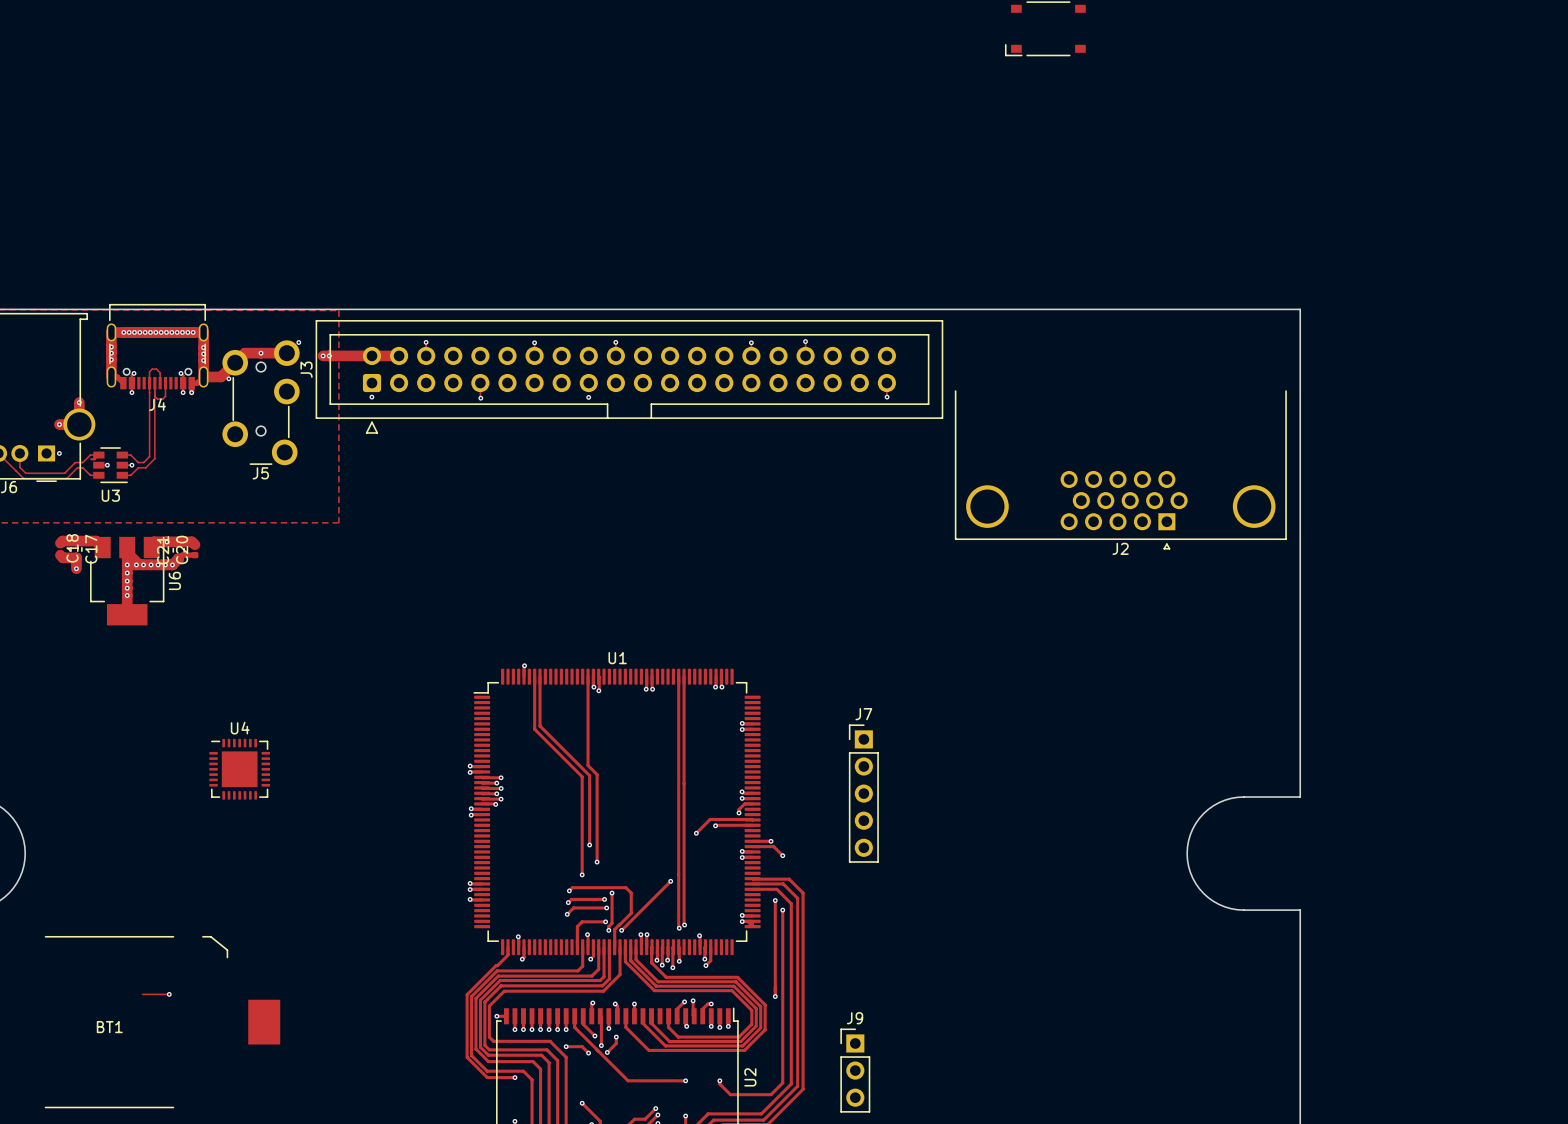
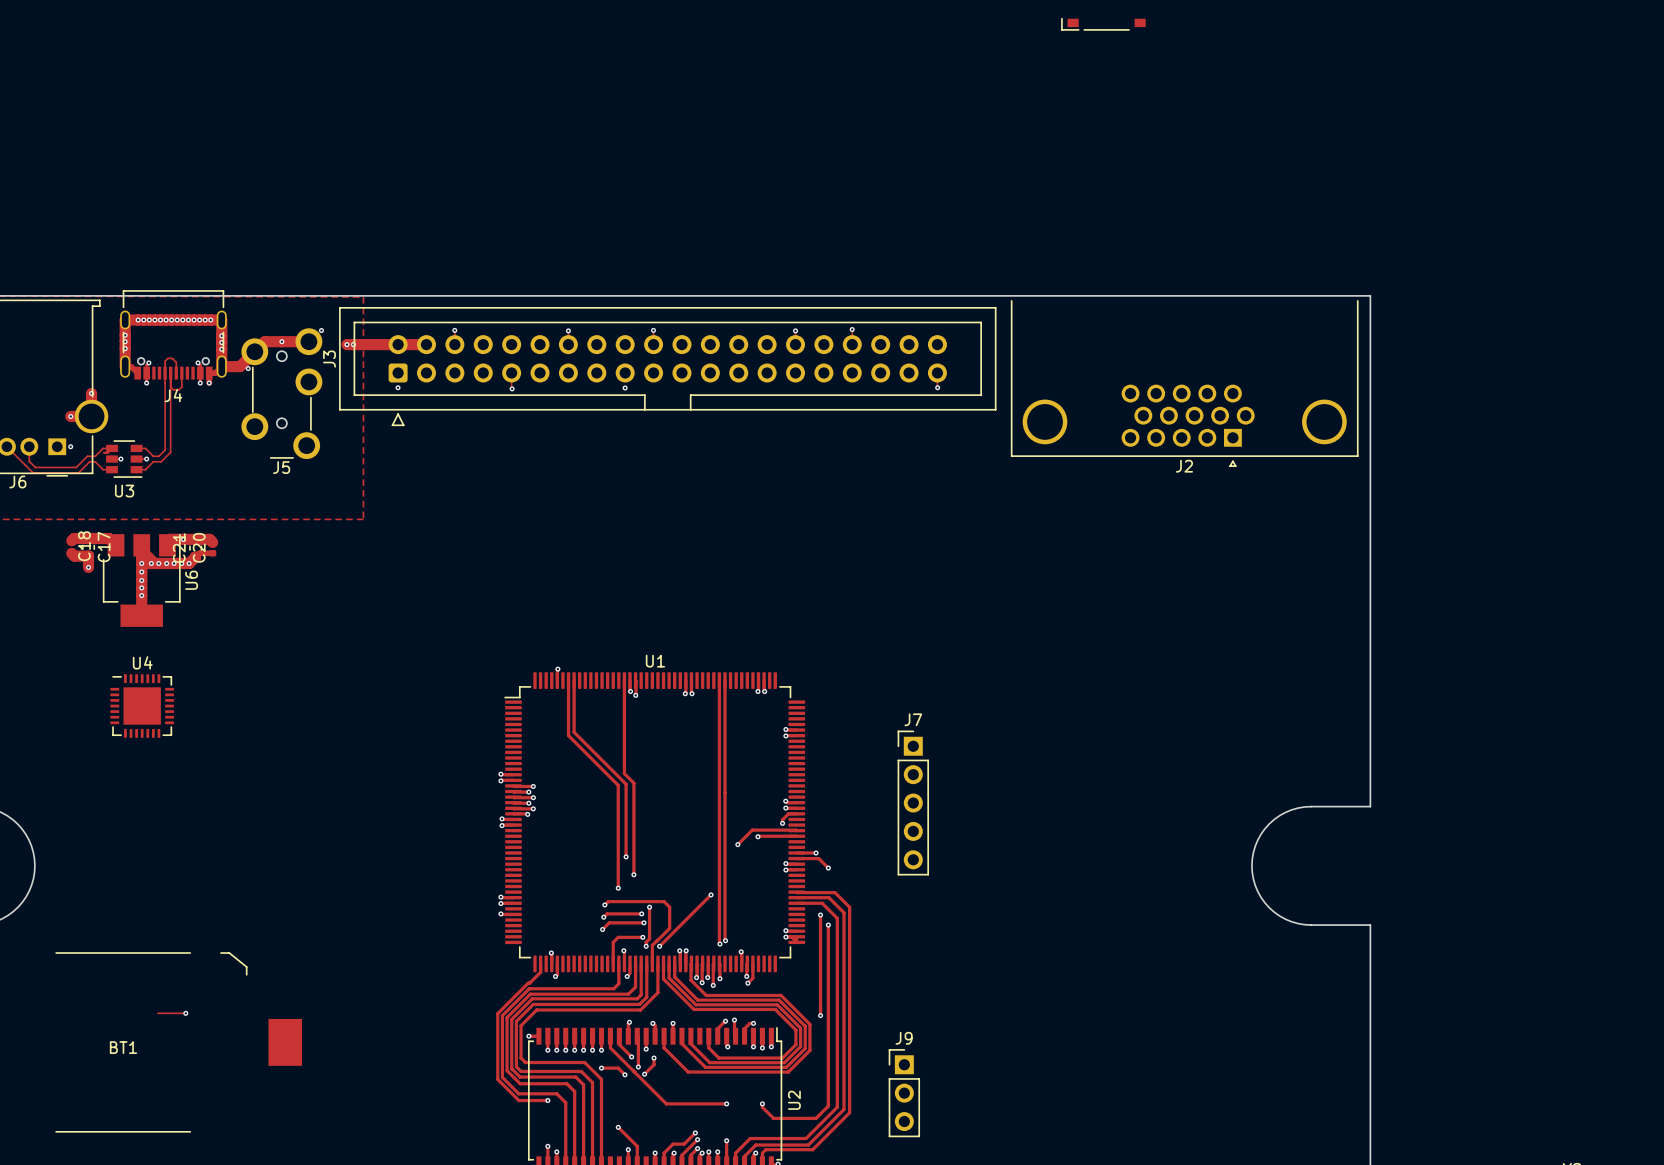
J2 position: (1120, 469) -> (1184, 383)
U4 position: (239, 769) -> (142, 706)

